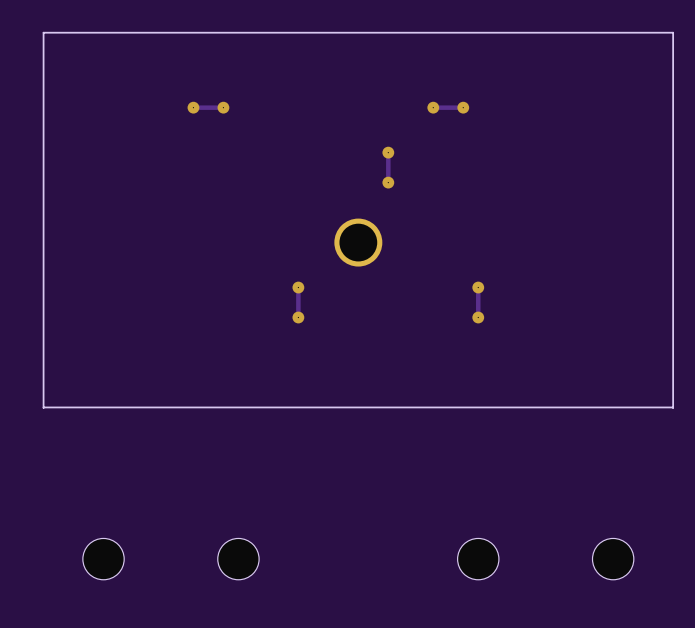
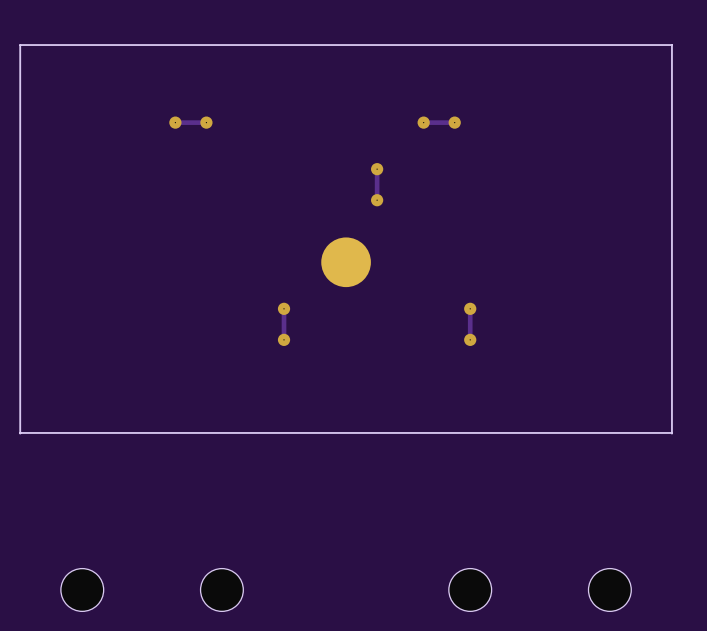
part footprint: [334, 218, 383, 267] -> [321, 237, 371, 288]

